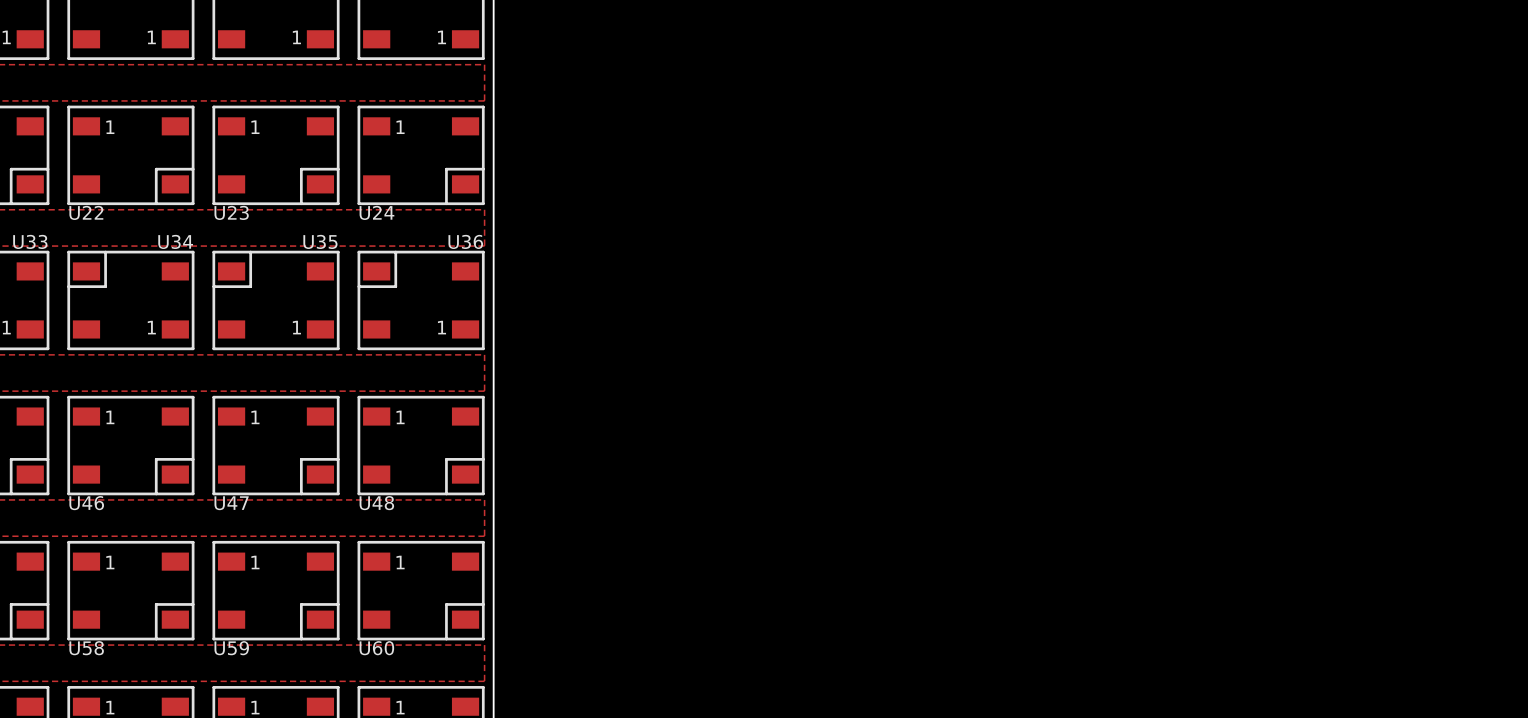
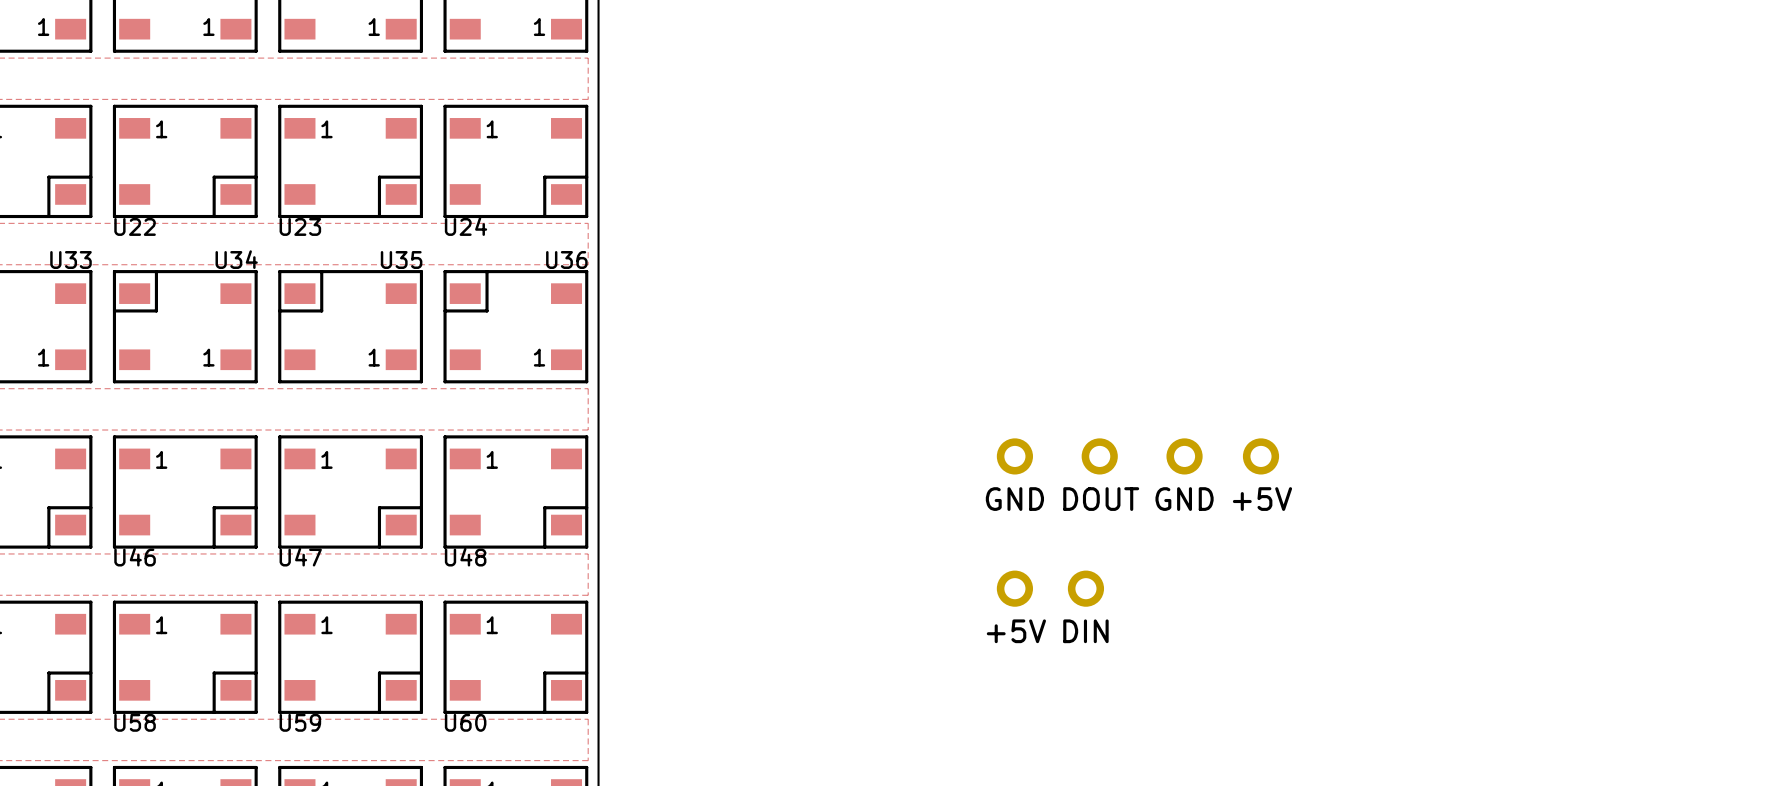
part: none -> GND (1014, 456)
part: none -> DOUT (1099, 456)
part: none -> GND (1184, 456)
part: none -> +5V (1260, 456)
part: none -> +5V (1014, 588)
part: none -> DIN (1085, 588)

